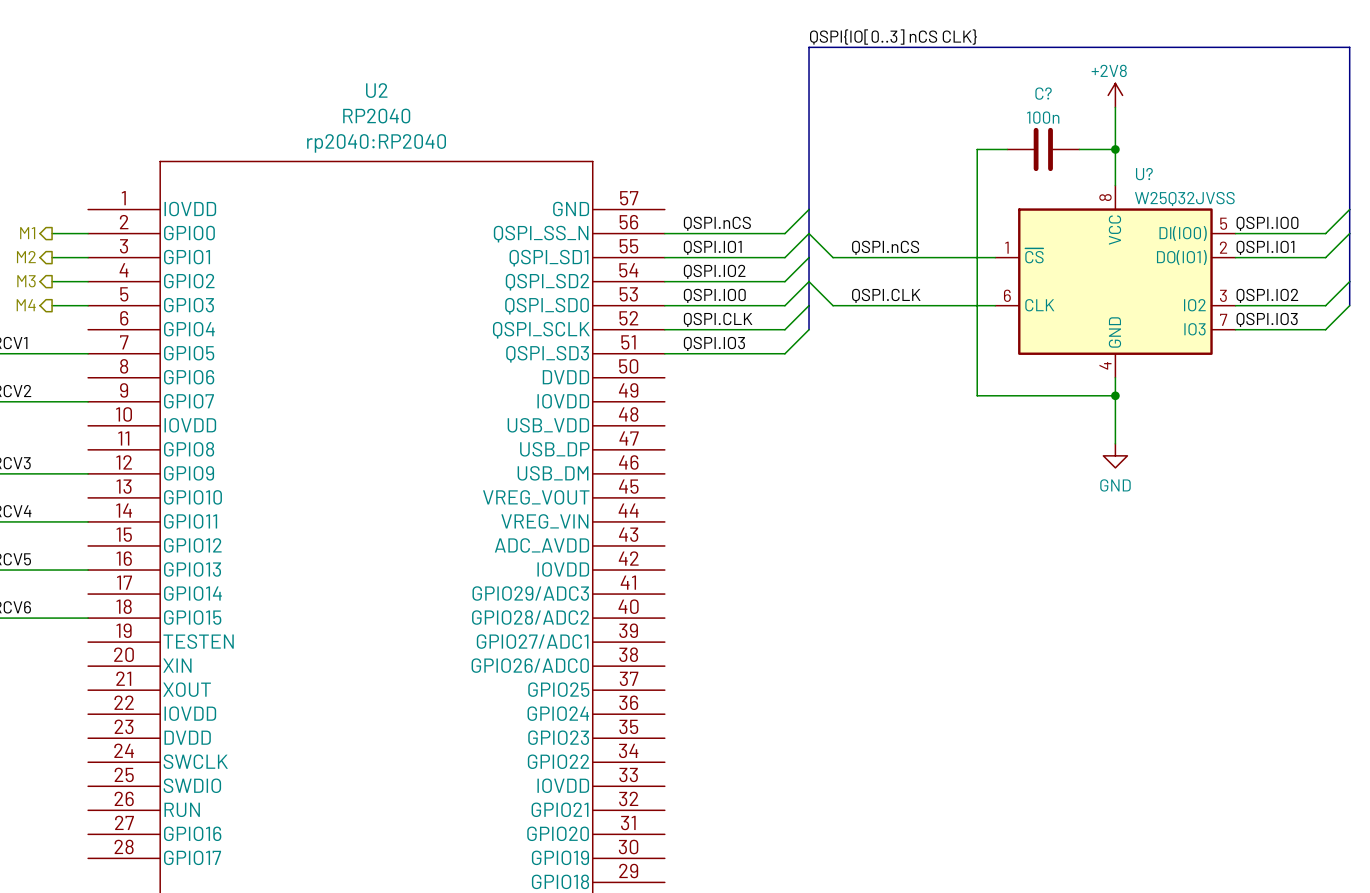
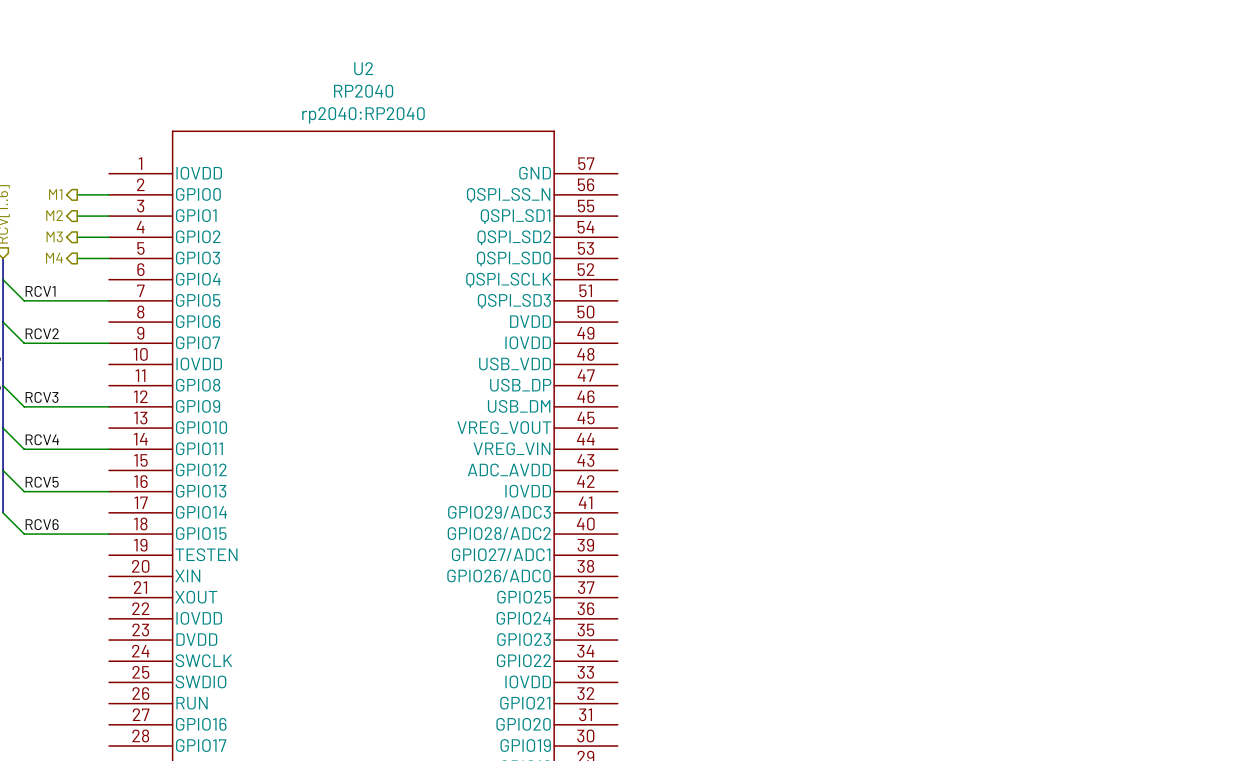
label: QSPI{IO[0..3] nCS CLK} (893, 37) -> none
power symbol: +2V8 (1115, 95) -> none
wire: (1115, 107) (1115, 185) -> none
wire: (1007, 149) (977, 149) (977, 395) (1115, 395) -> none
C?: 100n (1043, 149) -> none
wire: (1079, 149) (1115, 149) -> none
junction: (1115, 149) -> none
wire: (809, 209) (784, 233) (664, 233) -> none
wire: (1349, 209) (1325, 233) (1235, 233) -> none
label: QSPI.nCS (717, 223) -> none
label: QSPI.IO0 (1267, 223) -> none
wire: (1349, 233) (1325, 257) (1235, 257) -> none
label: QSPI.IO1 (712, 247) -> none
label: QSPI.nCS (885, 247) -> none
label: QSPI.IO1 (1265, 247) -> none
wire: (664, 257) (784, 257) (809, 233) (833, 257) (995, 257) -> none
wire: (809, 257) (784, 281) (664, 281) -> none
label: QSPI.IO2 (714, 271) -> none
U?: W25Q32JVSS (1115, 281) -> none
wire: (1349, 281) (1325, 305) (1235, 305) -> none
label: QSPI.IO0 (714, 295) -> none
label: QSPI.CLK (886, 295) -> none
label: QSPI.IO2 (1267, 295) -> none
wire: (664, 305) (784, 305) (809, 281) (833, 305) (995, 305) -> none
wire: (809, 305) (784, 329) (664, 329) -> none
wire: (1349, 305) (1325, 329) (1235, 329) -> none
bus: (1349, 305) (1349, 47) (809, 47) (809, 329) -> none
label: QSPI.CLK (718, 319) -> none
label: QSPI.IO3 (1267, 319) -> none
wire: (809, 329) (784, 353) (664, 353) -> none
label: QSPI.IO3 (714, 343) -> none
wire: (1115, 377) (1115, 443) -> none
junction: (1115, 395) -> none
power symbol: GND (1115, 455) -> none

